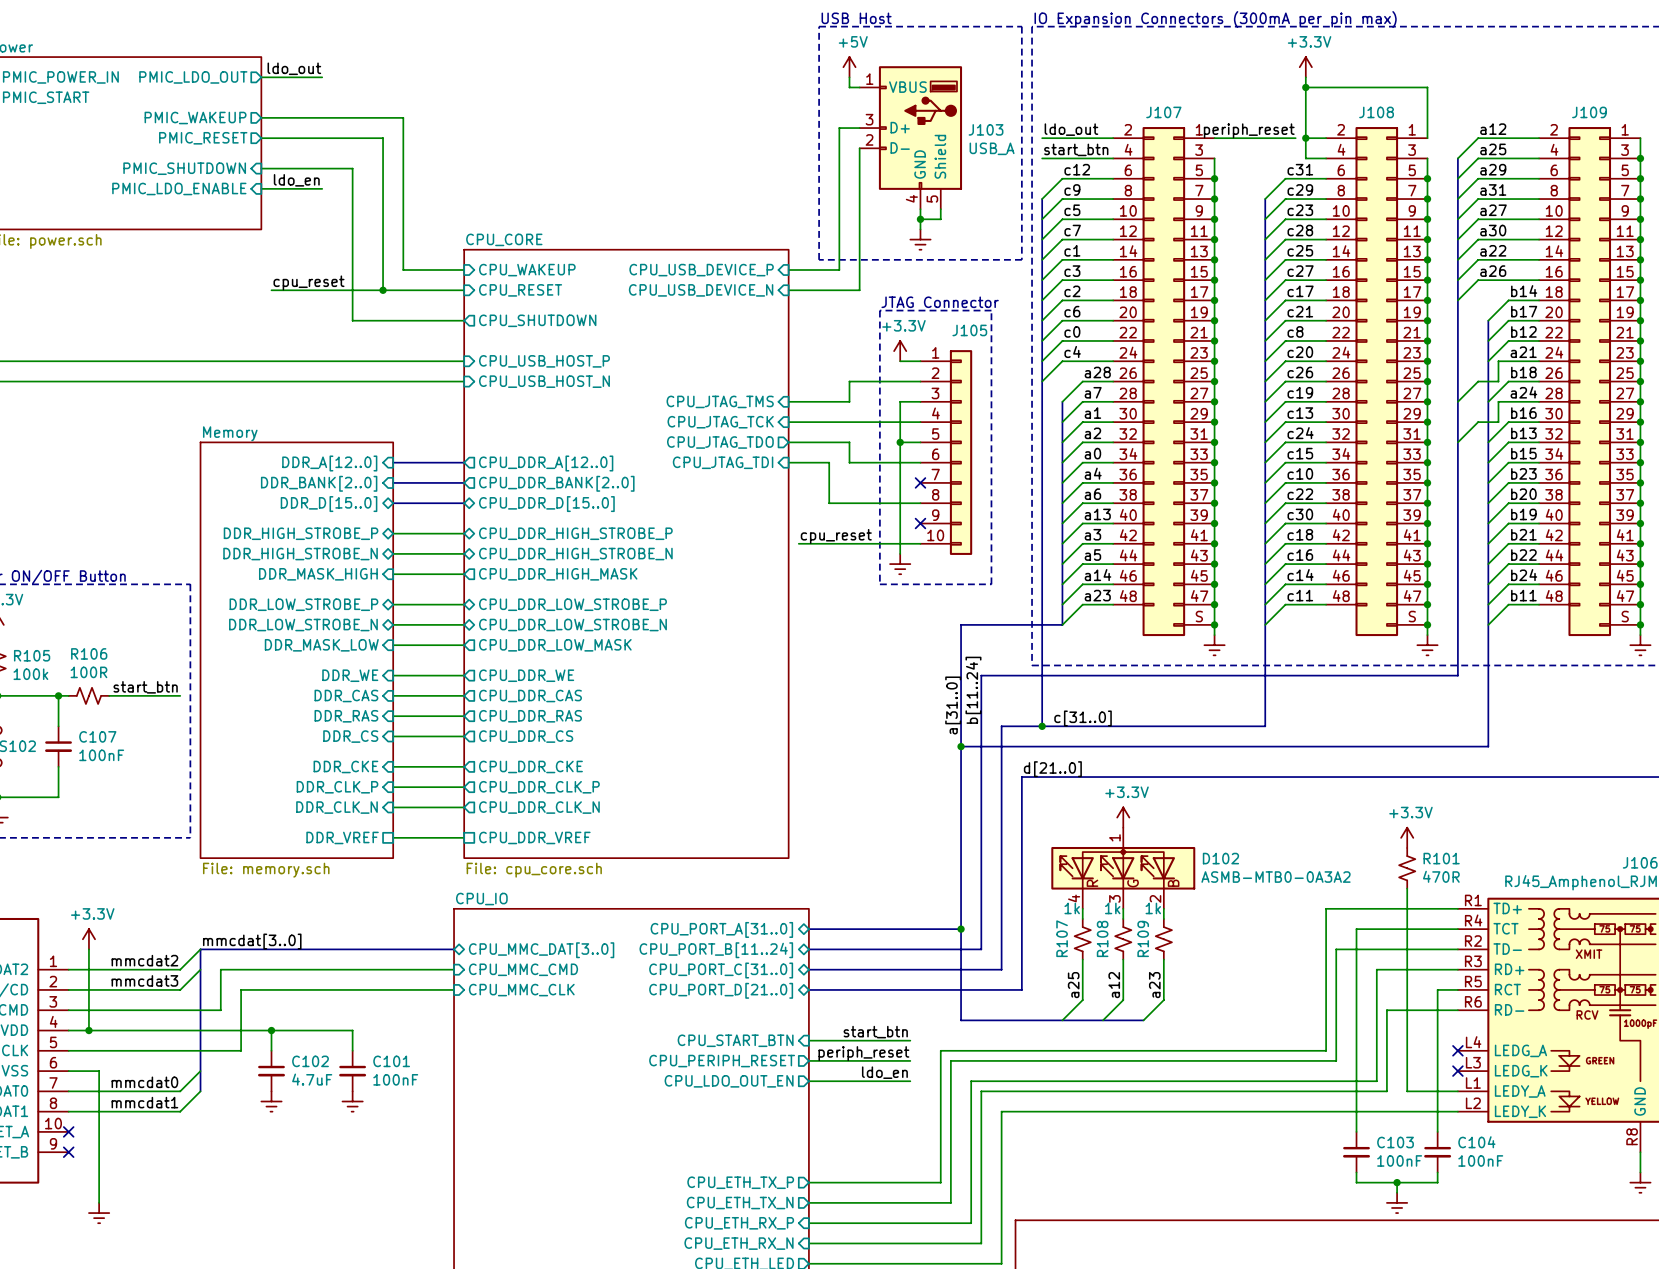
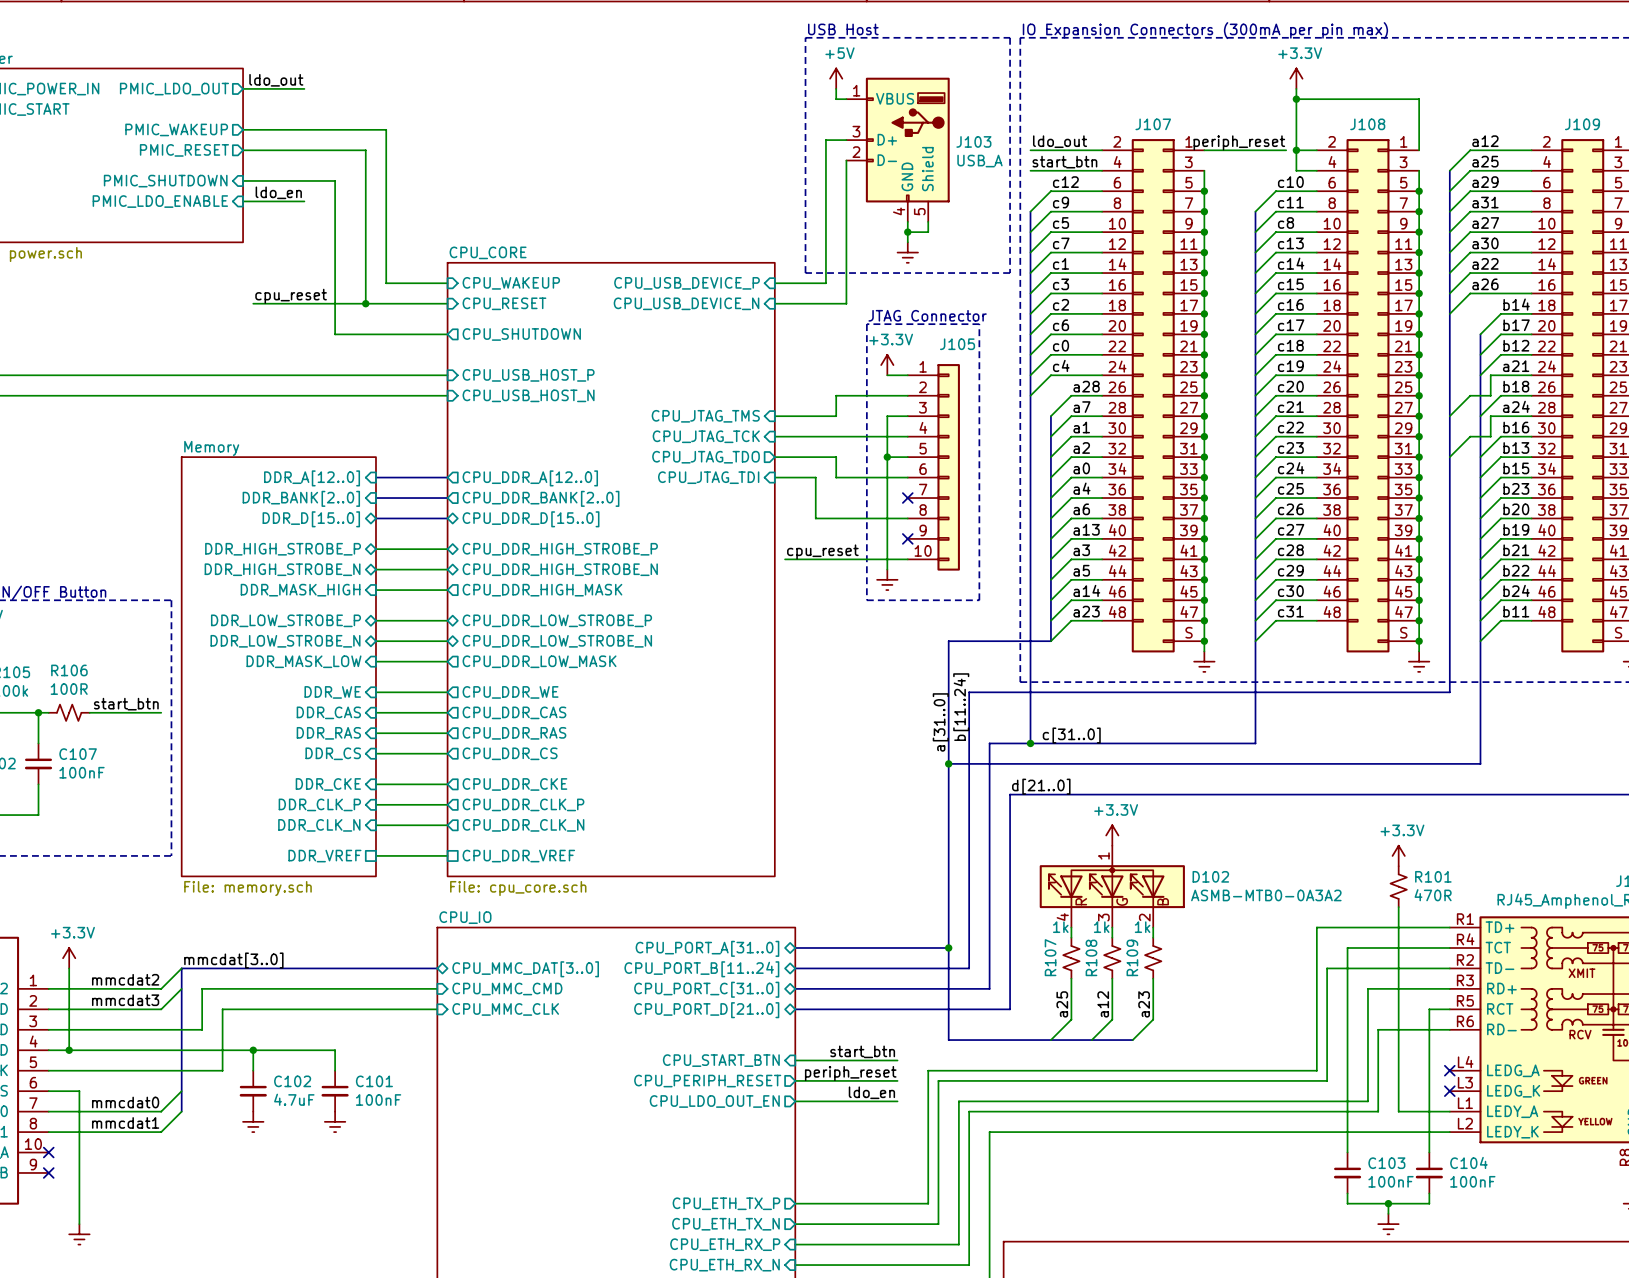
label: c31 (1300, 169) -> c10 (1290, 182)
label: c29 (1300, 189) -> c11 (1290, 202)
label: c23 (1300, 210) -> c8 (1286, 222)
label: c28 (1300, 230) -> c13 (1290, 243)
label: c25 (1300, 250) -> c14 (1291, 263)
label: c27 (1300, 271) -> c15 (1290, 284)
label: c17 (1300, 291) -> c16 (1290, 304)
label: c21 (1300, 311) -> c17 (1291, 325)
label: c8 (1295, 331) -> c18 (1290, 345)
label: c20 (1300, 352) -> c19 (1290, 366)
label: c26 (1300, 372) -> c20 (1290, 386)
label: c19 (1300, 392) -> c21 (1290, 407)
label: c13 (1300, 413) -> c22 (1290, 427)
label: c24 (1300, 433) -> c23 (1290, 447)
label: c15 (1300, 453) -> c24 (1291, 468)
label: c10 (1300, 473) -> c25 (1290, 488)
label: c22 (1300, 494) -> c26 (1290, 509)
label: c30 (1300, 514) -> c27 (1291, 529)
label: c18 (1300, 534) -> c28 (1290, 550)
label: c16 (1300, 555) -> c29 (1290, 570)
label: c14 (1300, 575) -> c30 (1290, 591)
label: c11 (1300, 595) -> c31 (1290, 611)

